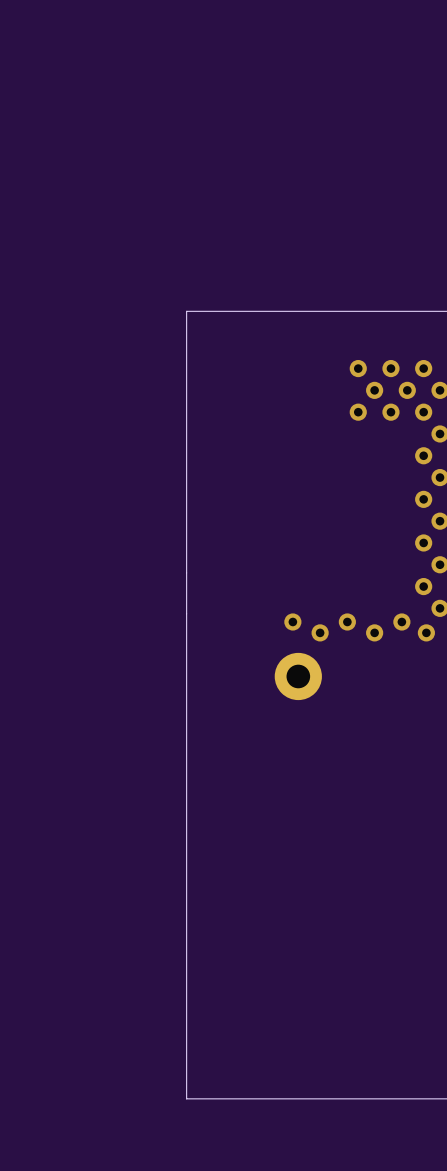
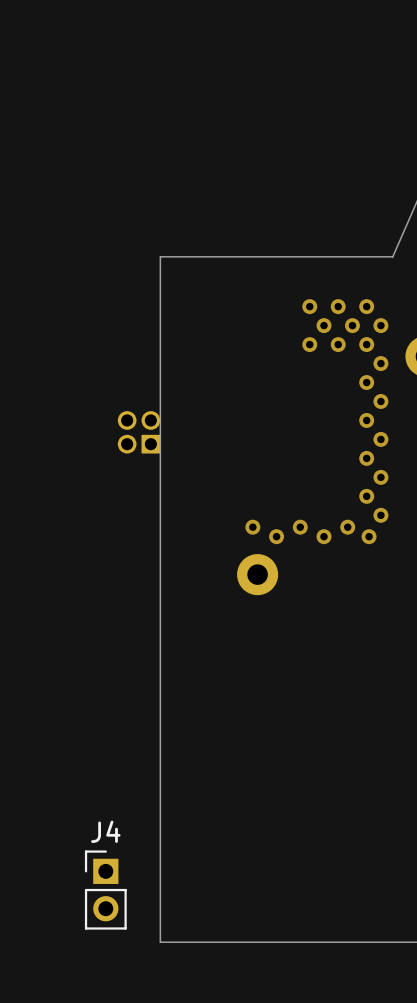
part: none -> (139, 432)
J4: none -> (105, 890)

